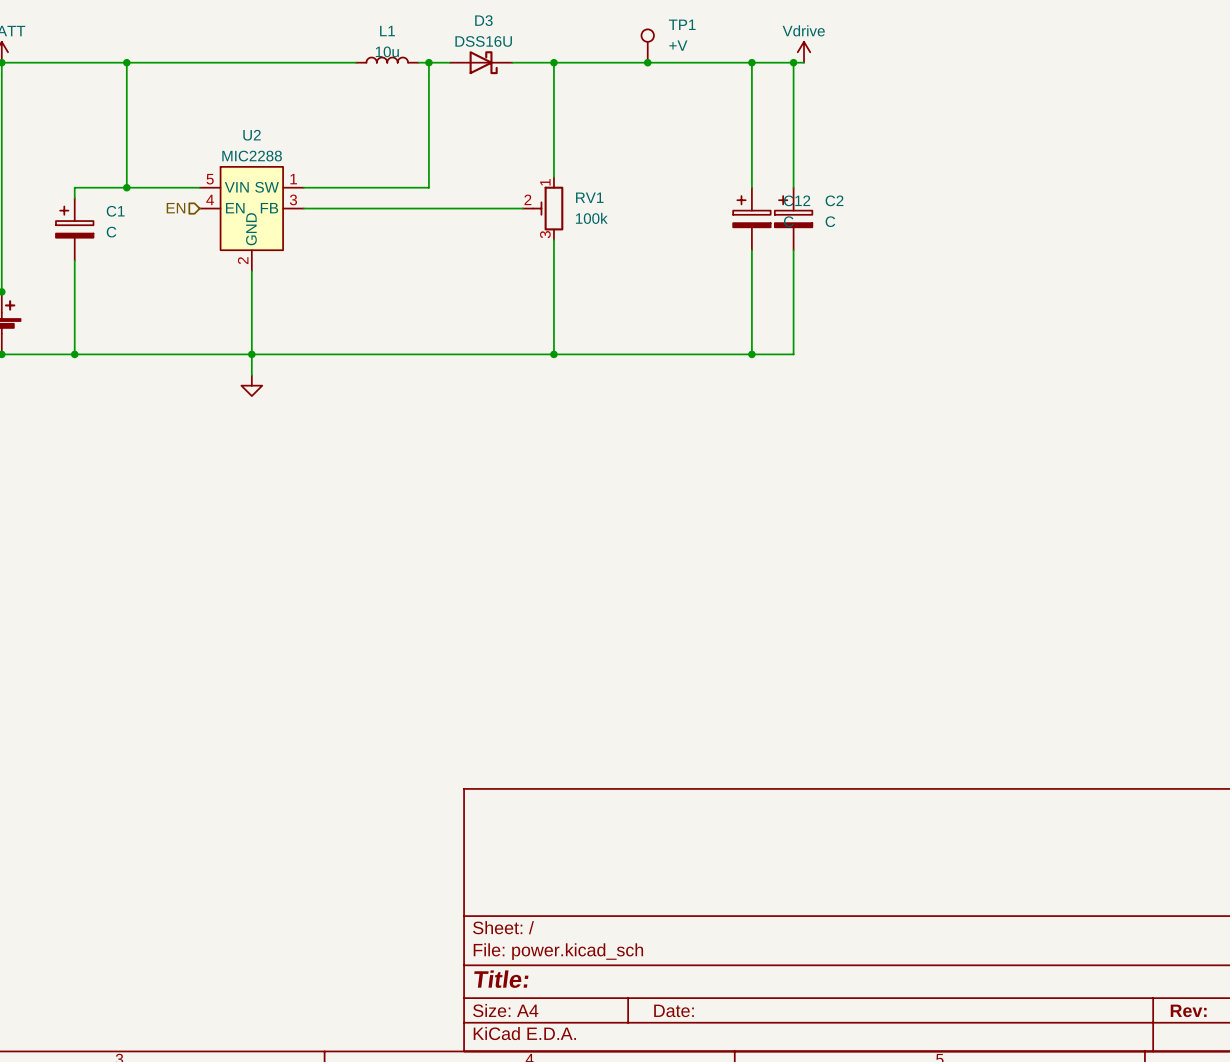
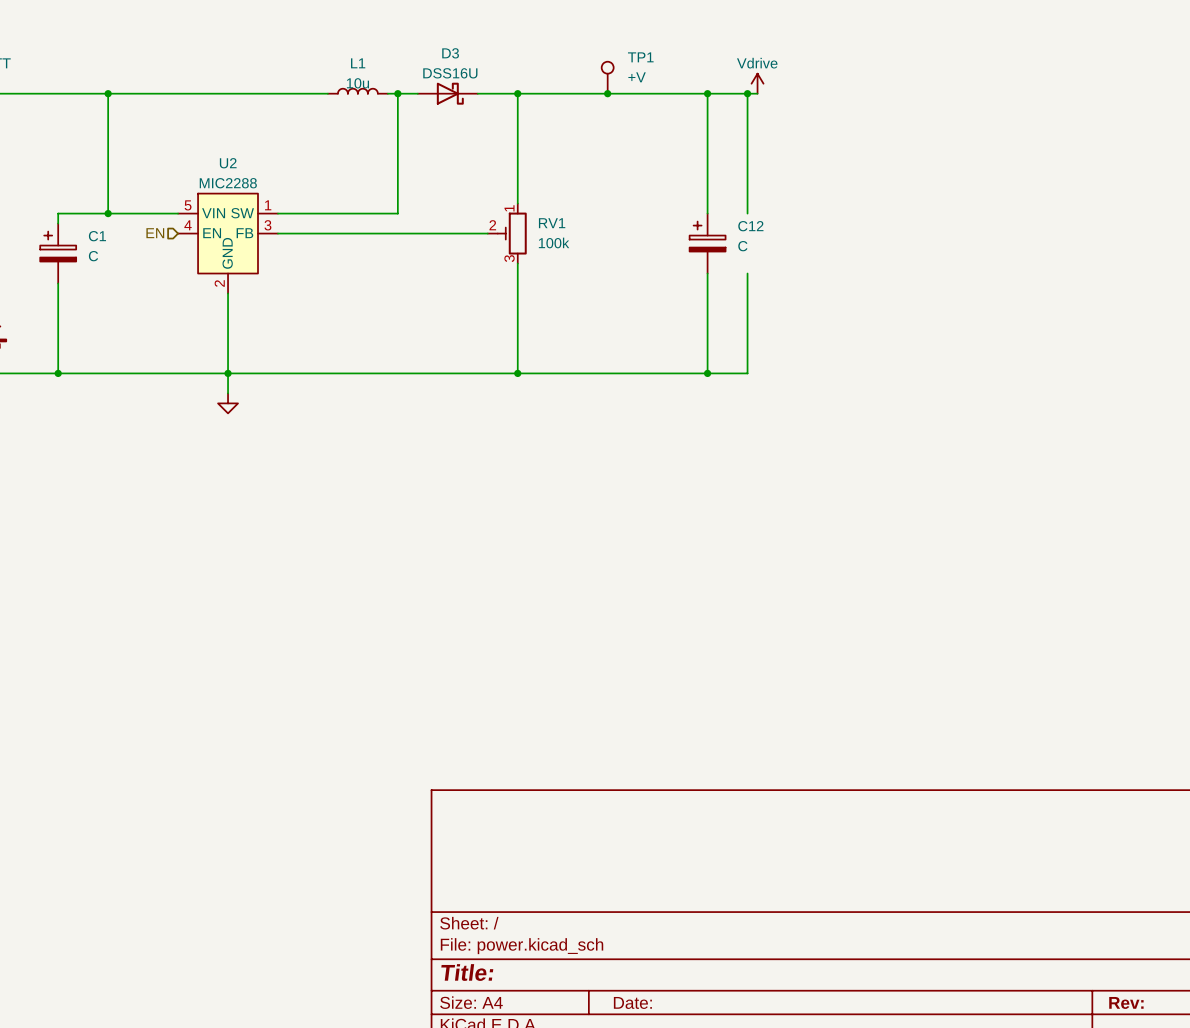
C2: C (793, 218) -> none

